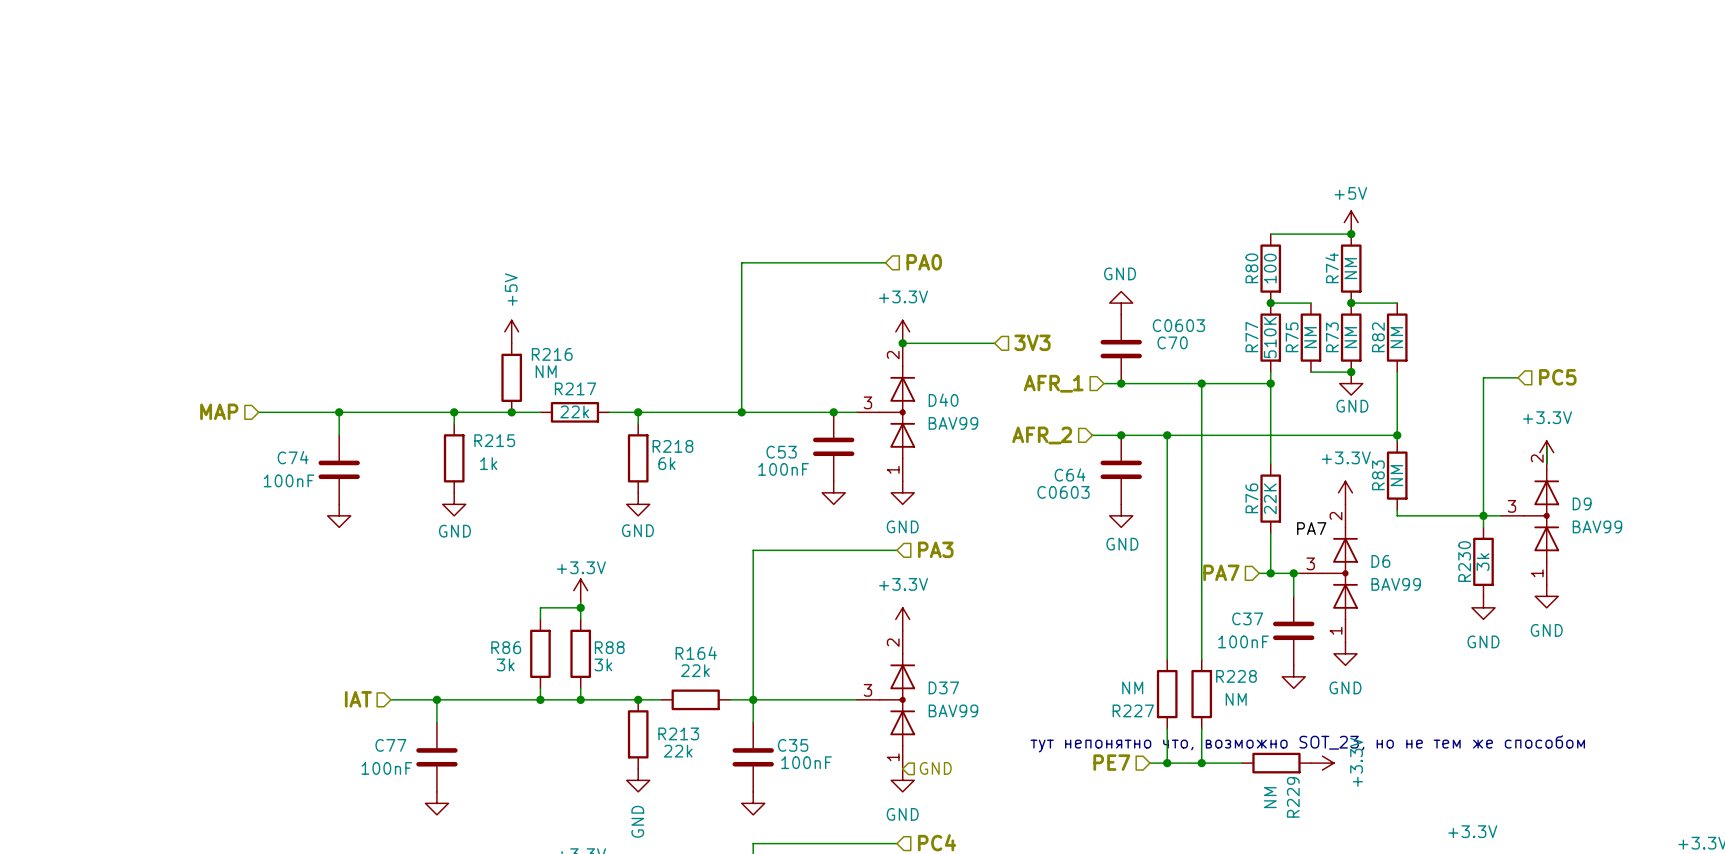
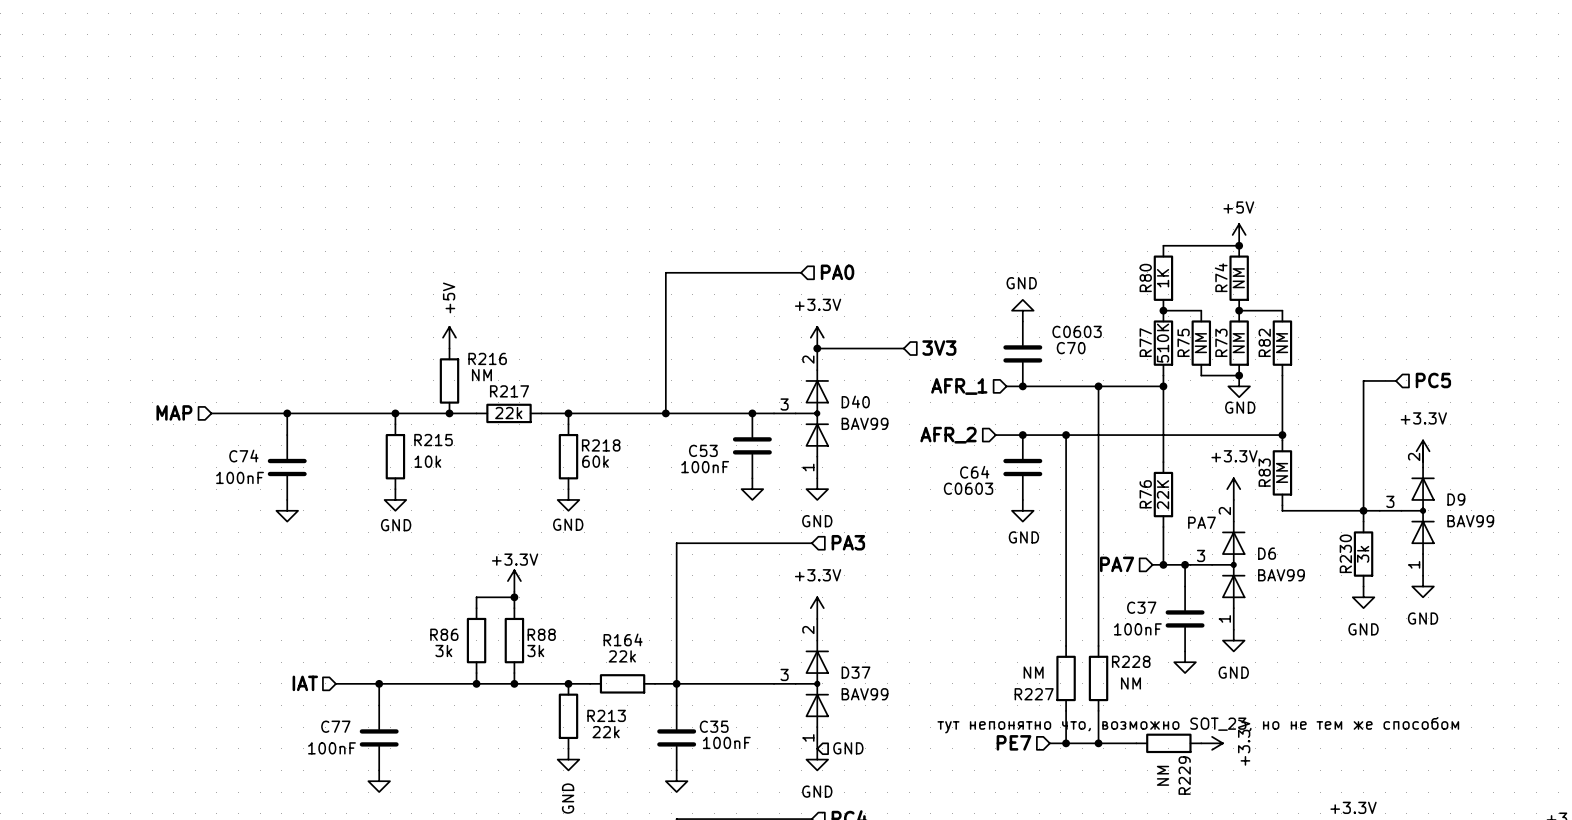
R80 value: 100 (1270, 268) -> 1K (1163, 278)
R215 value: 1k (488, 463) -> 10k (427, 461)
R218 value: 6k (666, 463) -> 60k (595, 461)

